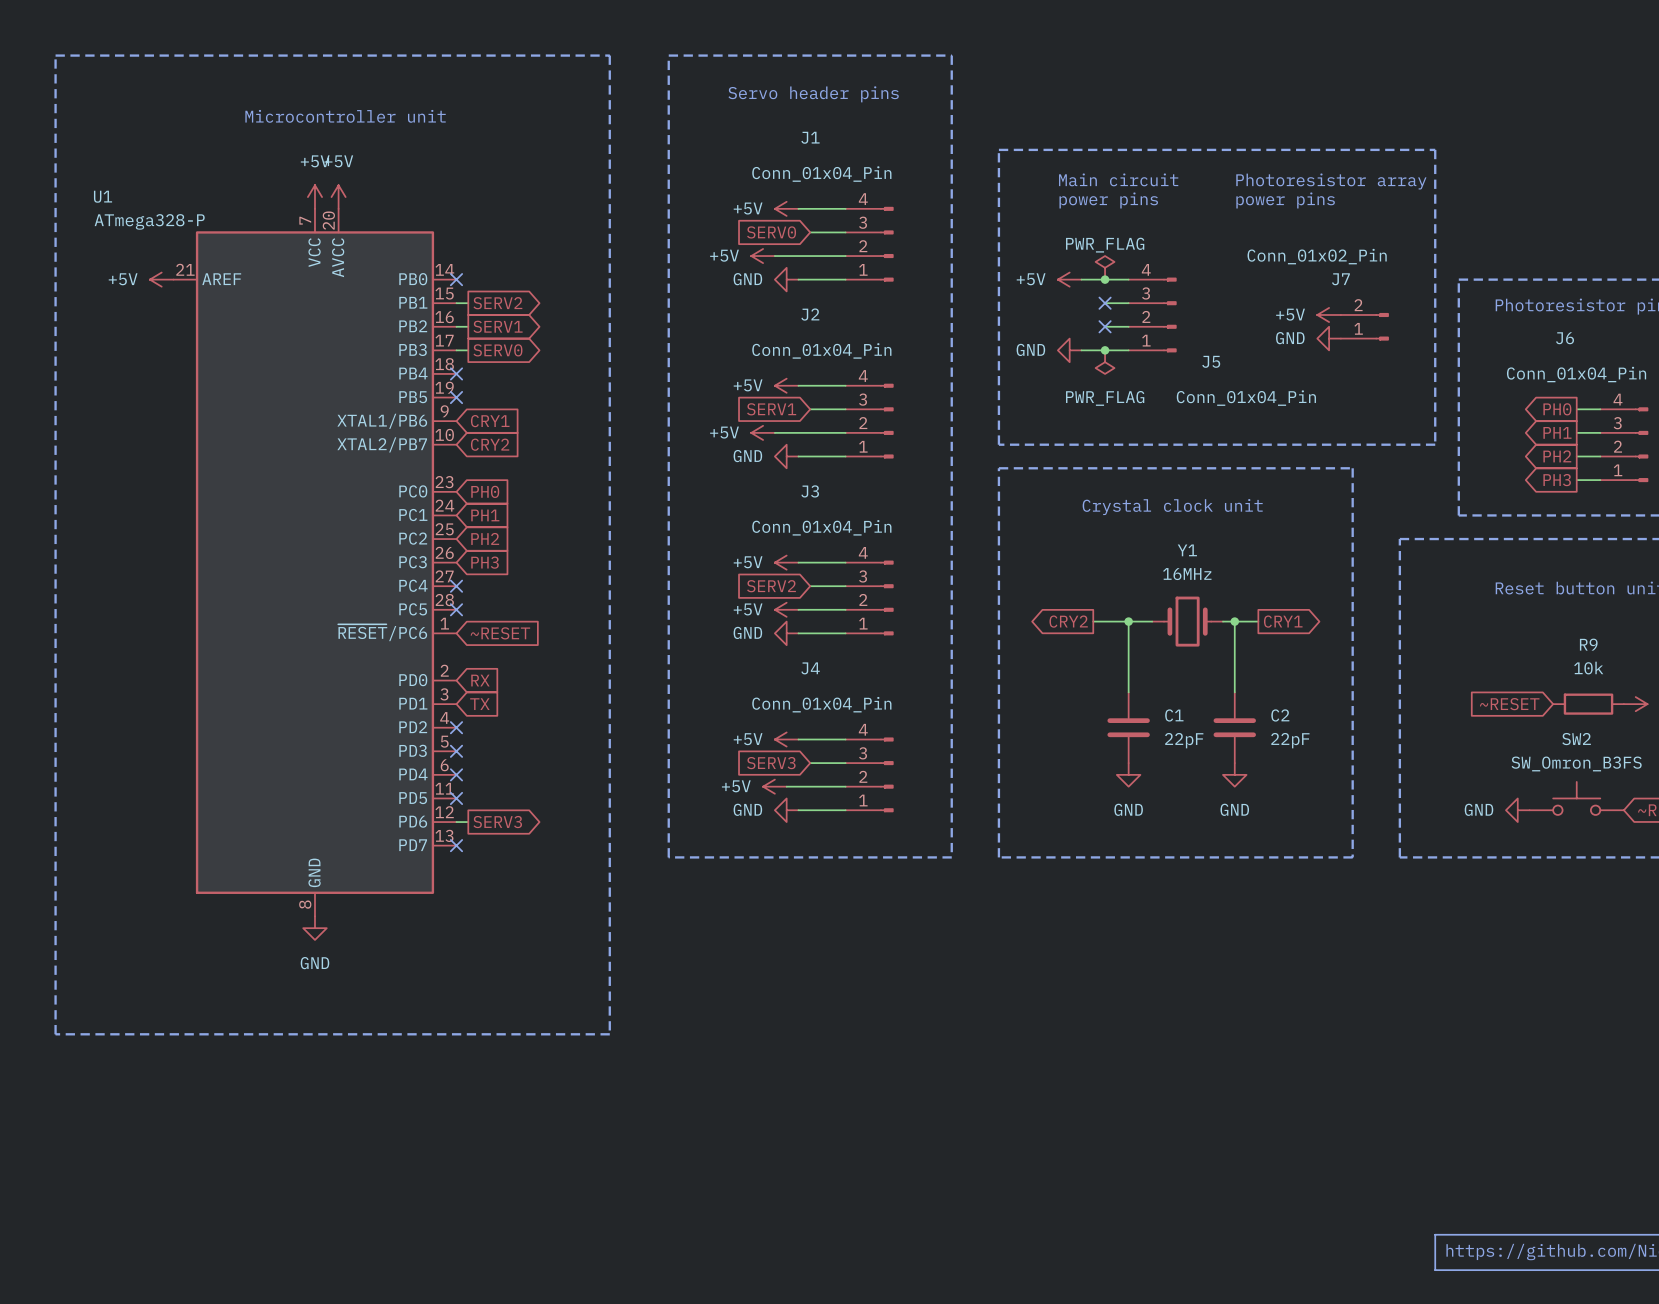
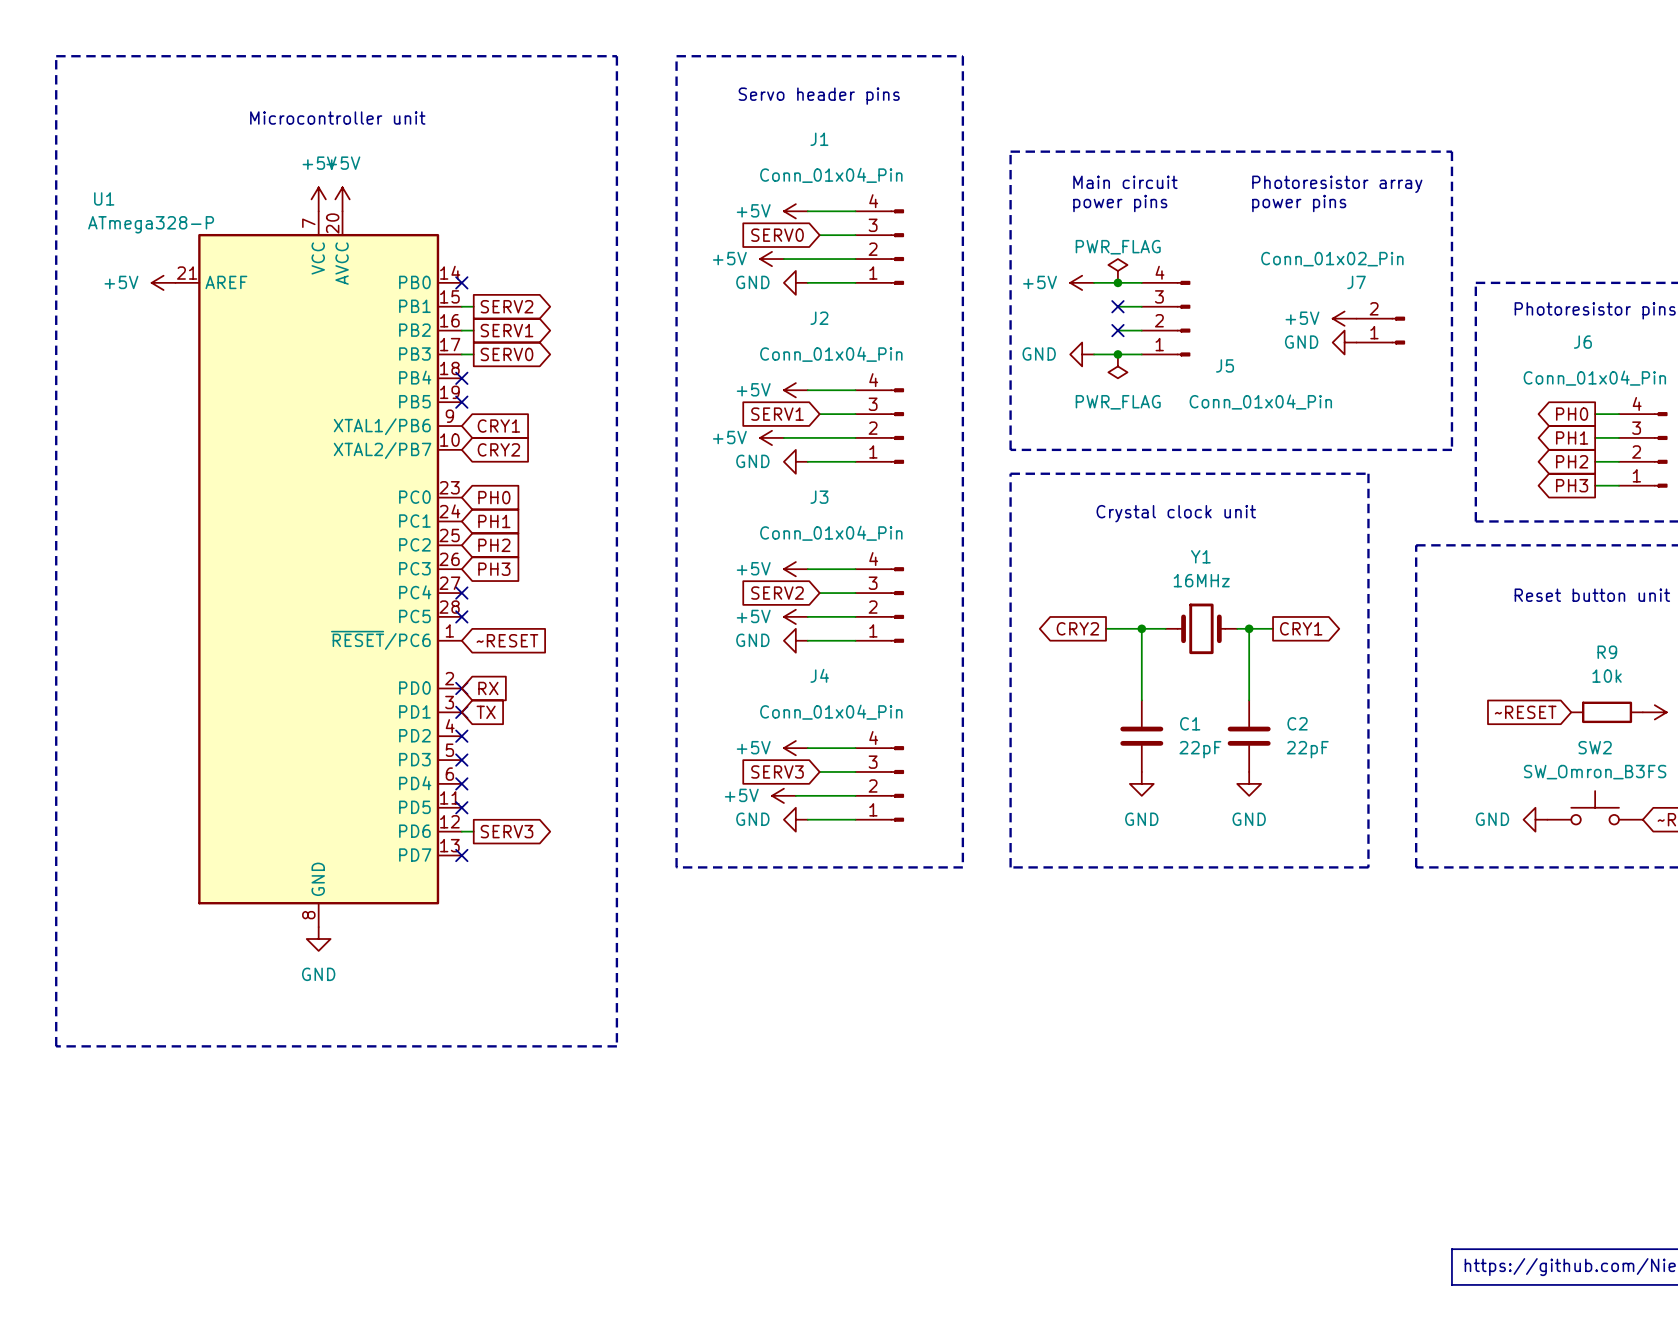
no-connect mark: none -> (461, 688)
no-connect mark: none -> (461, 712)

